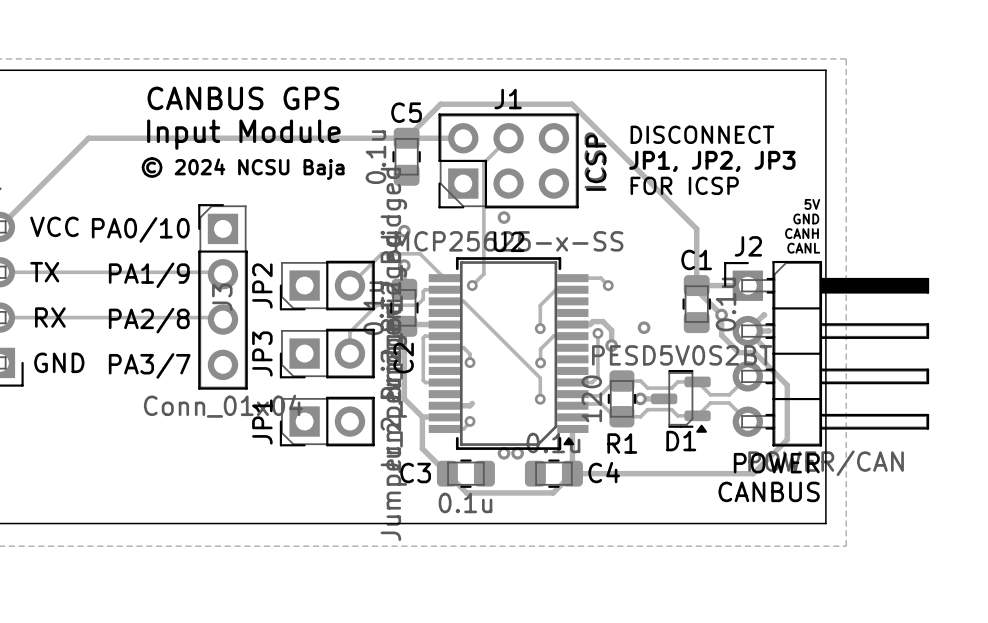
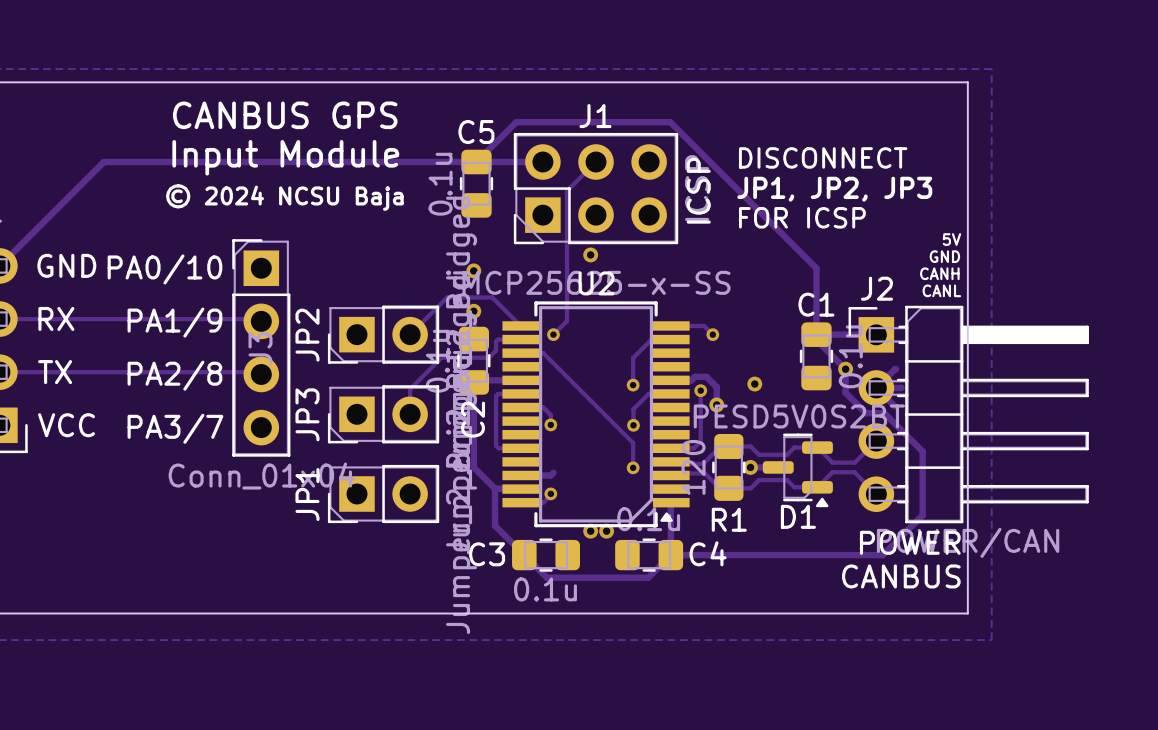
text: VCC (54, 226) -> GND (66, 265)
text: TX (44, 272) -> RX (56, 318)
text: RX (50, 317) -> TX (55, 372)
text: GND (59, 362) -> VCC (66, 425)

